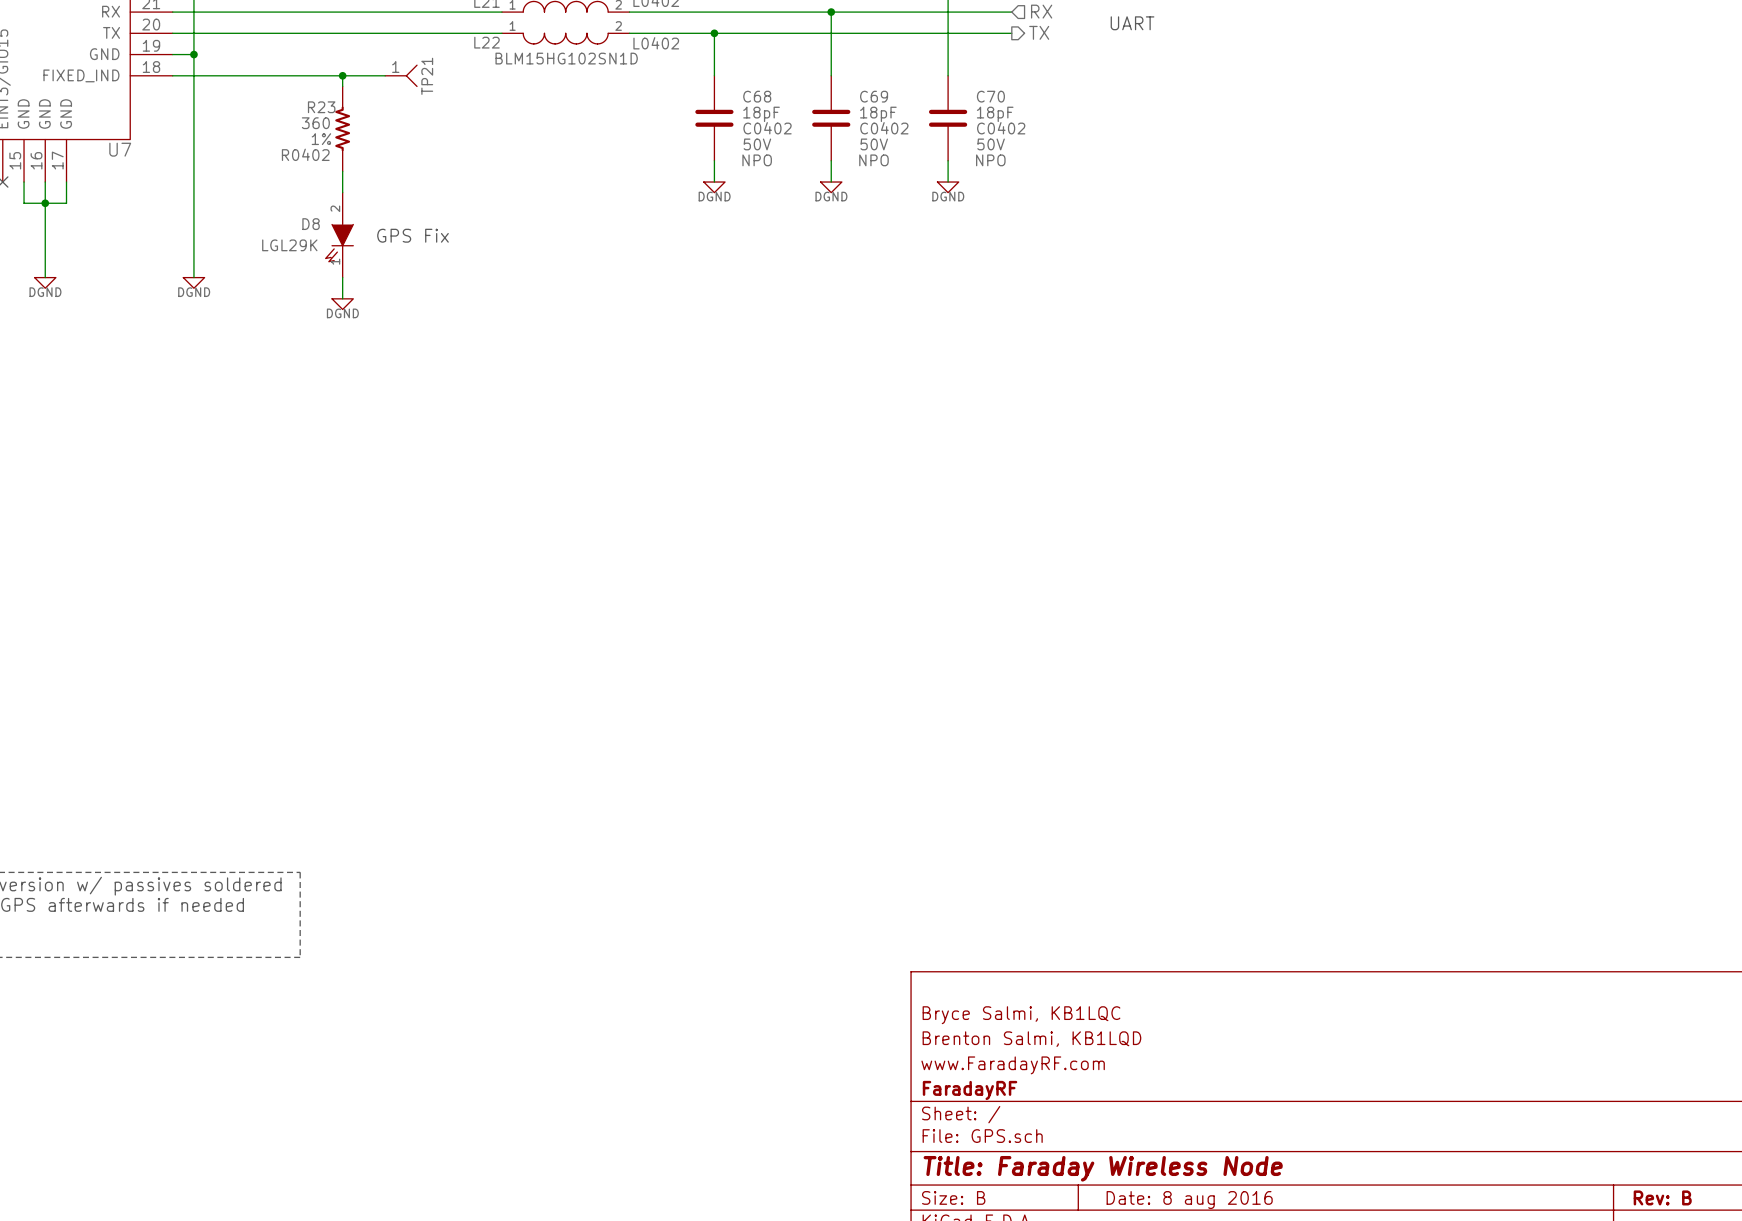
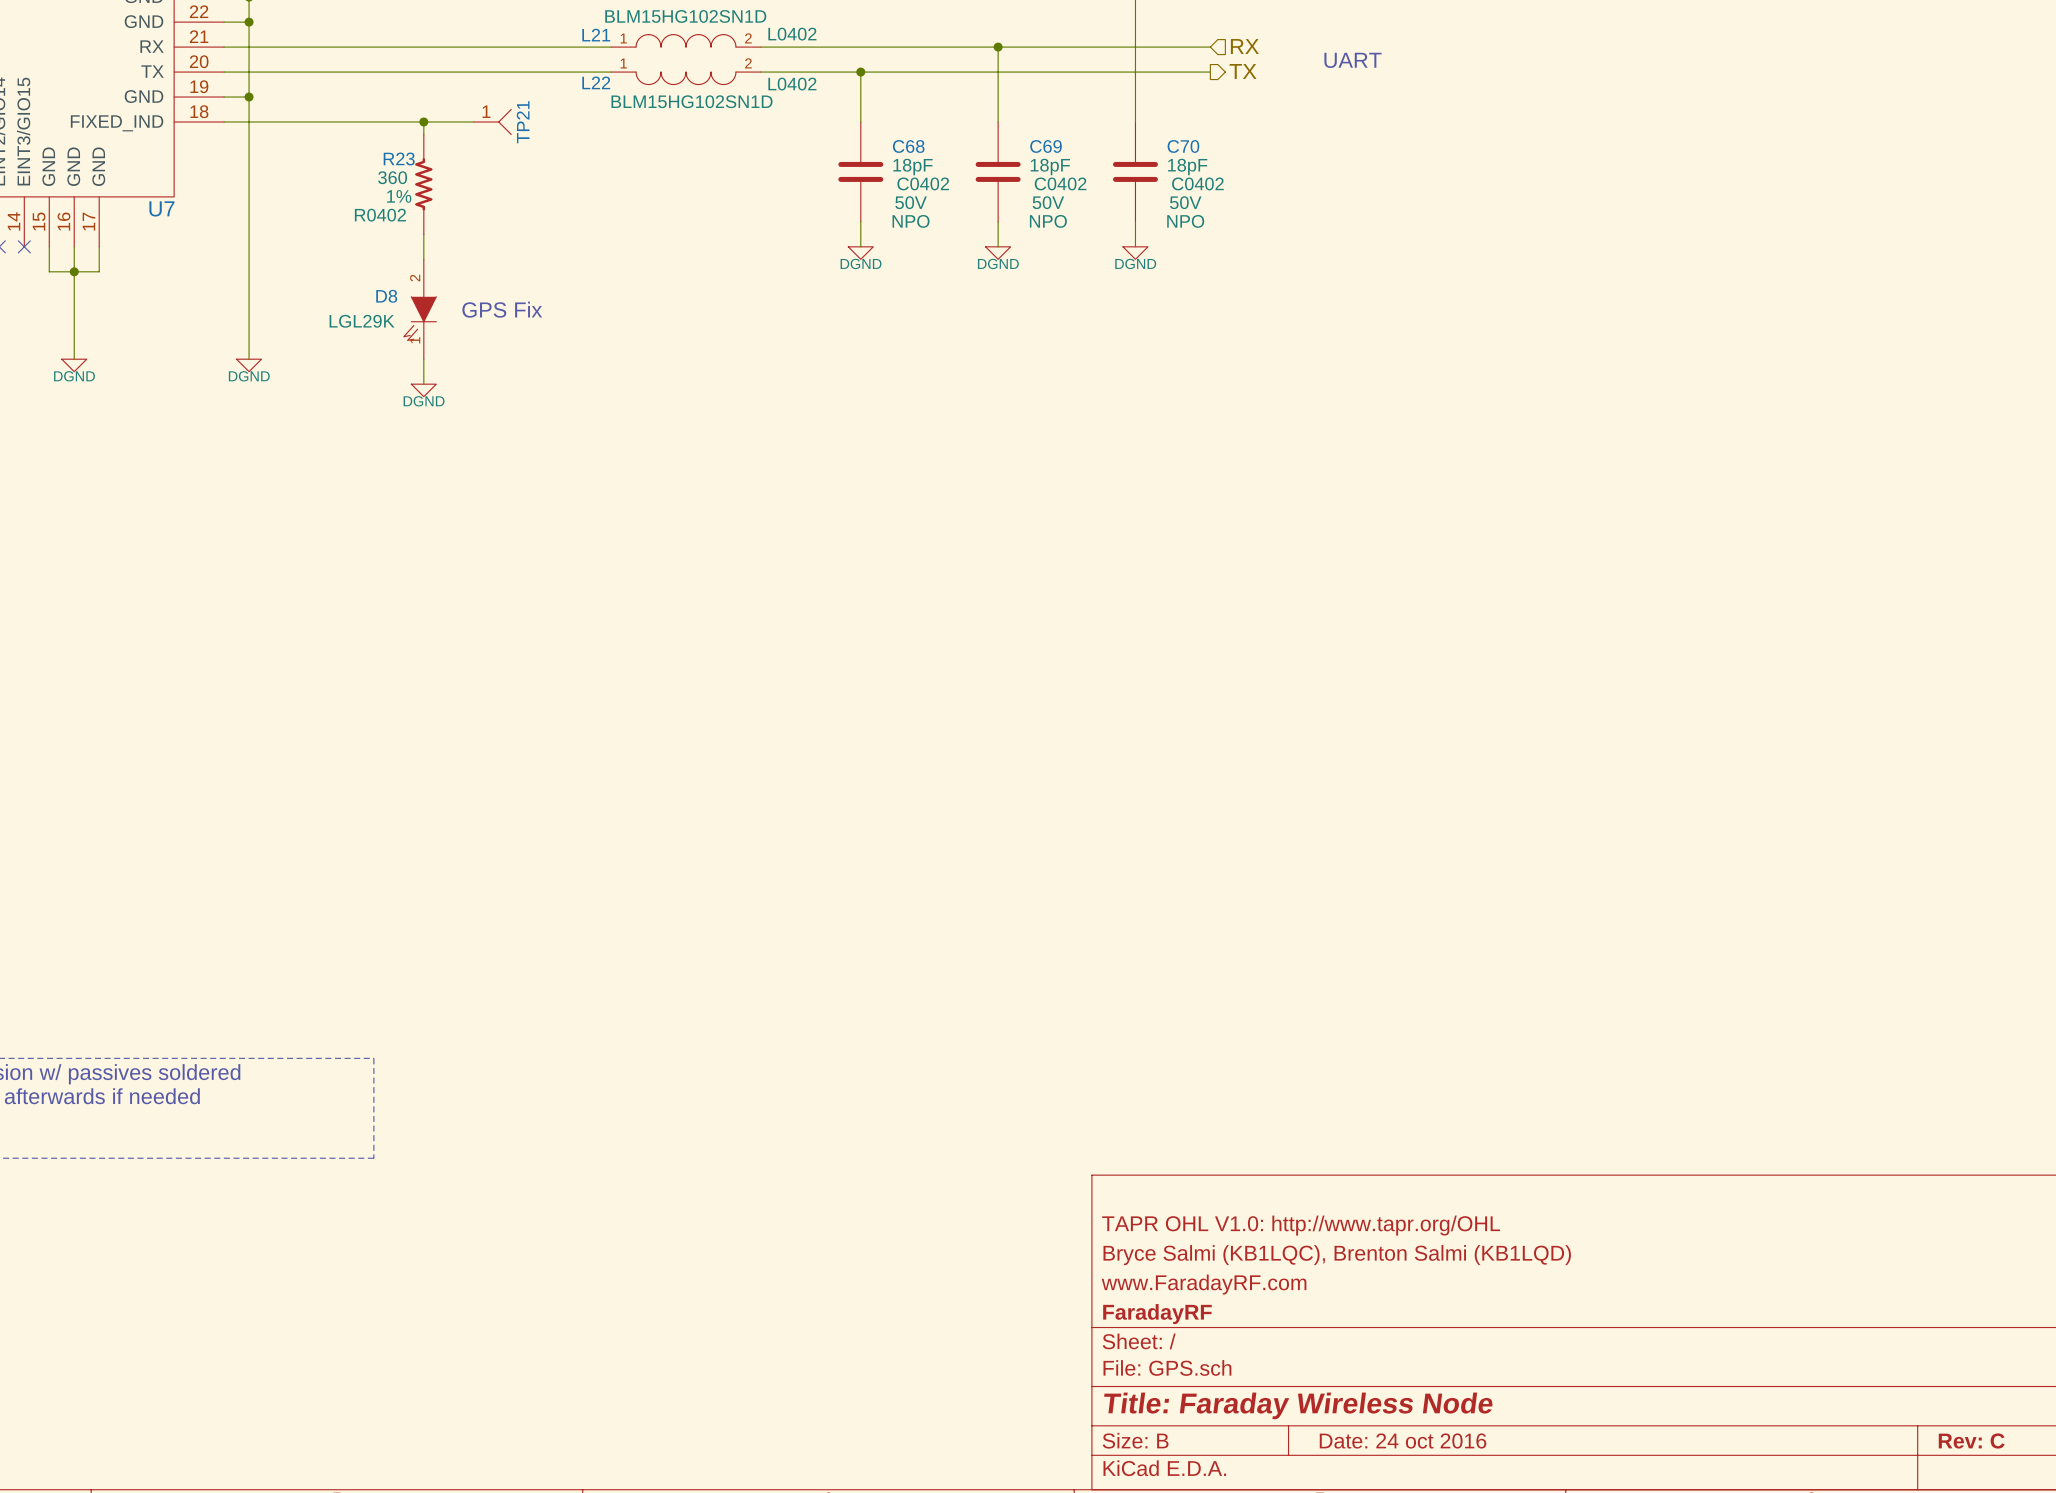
title block: Bryce Salmi, KB1LQC (1021, 1015) -> TAPR OHL V1.0: http://www.tapr.org/OHL (1301, 1225)
title block: Brenton Salmi, KB1LQD (1031, 1039) -> Bryce Salmi (KB1LQC), Brenton Salmi (KB1LQD) (1337, 1255)
title block: Rev: B (1662, 1197) -> Rev: C (1971, 1441)
title block: Date: 8 aug 2016 (1189, 1200) -> Date: 24 oct 2016 (1403, 1441)

